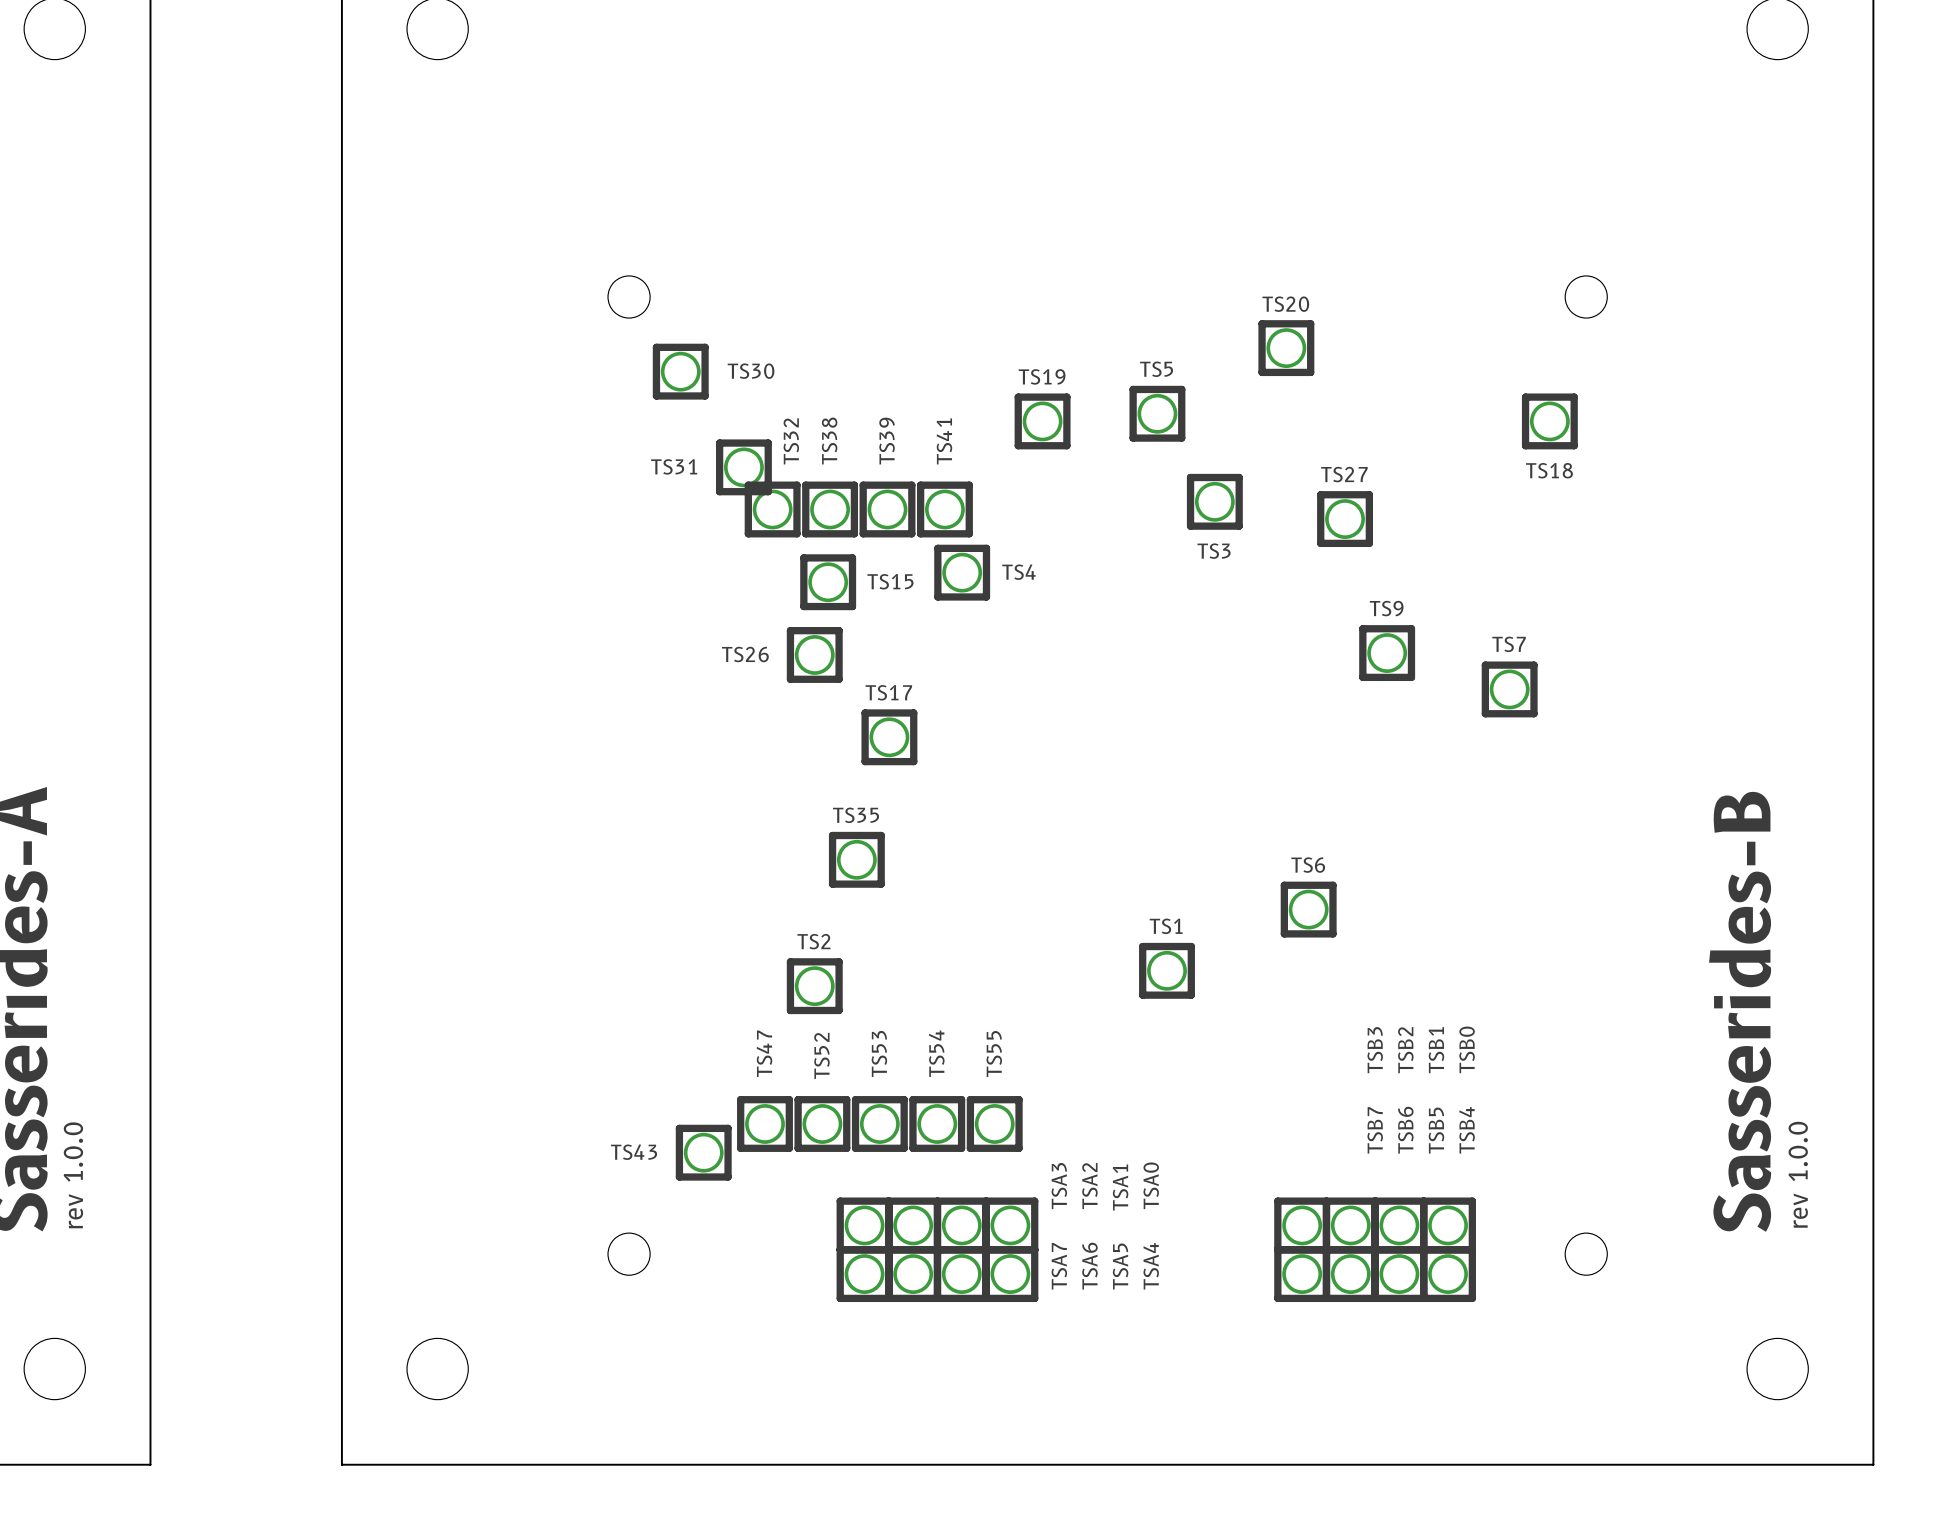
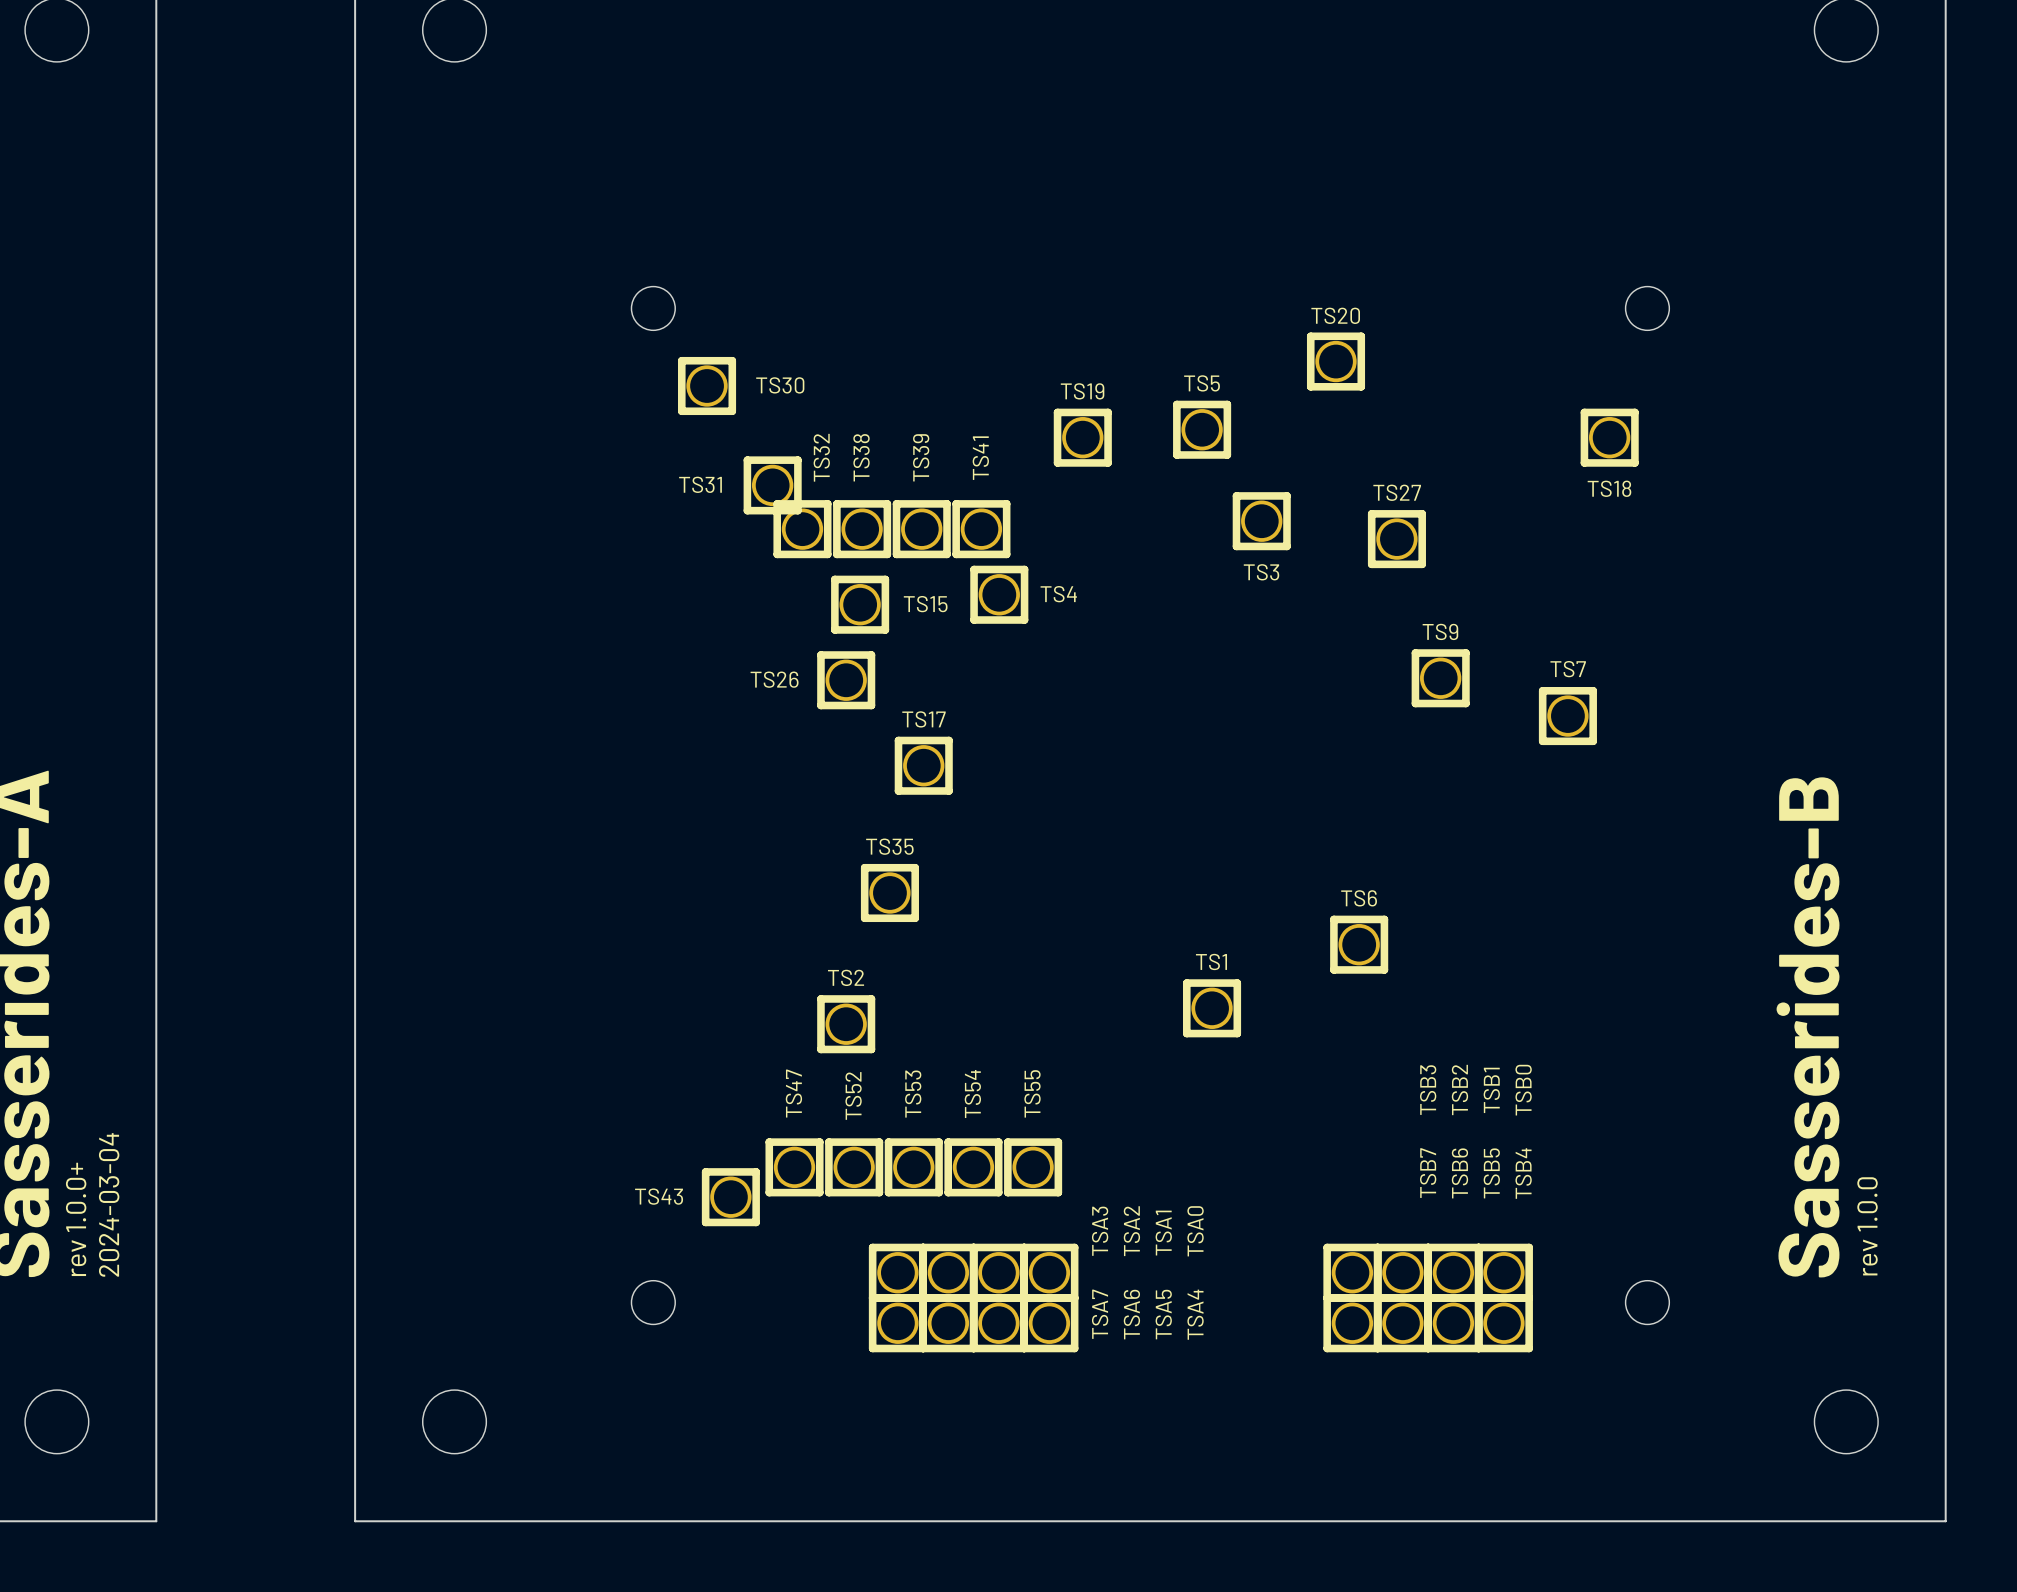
text: none -> 2024-03-04 (109, 1204)
text: rev 1.0.0 (73, 1175) -> rev 1.0.0+ (76, 1219)

